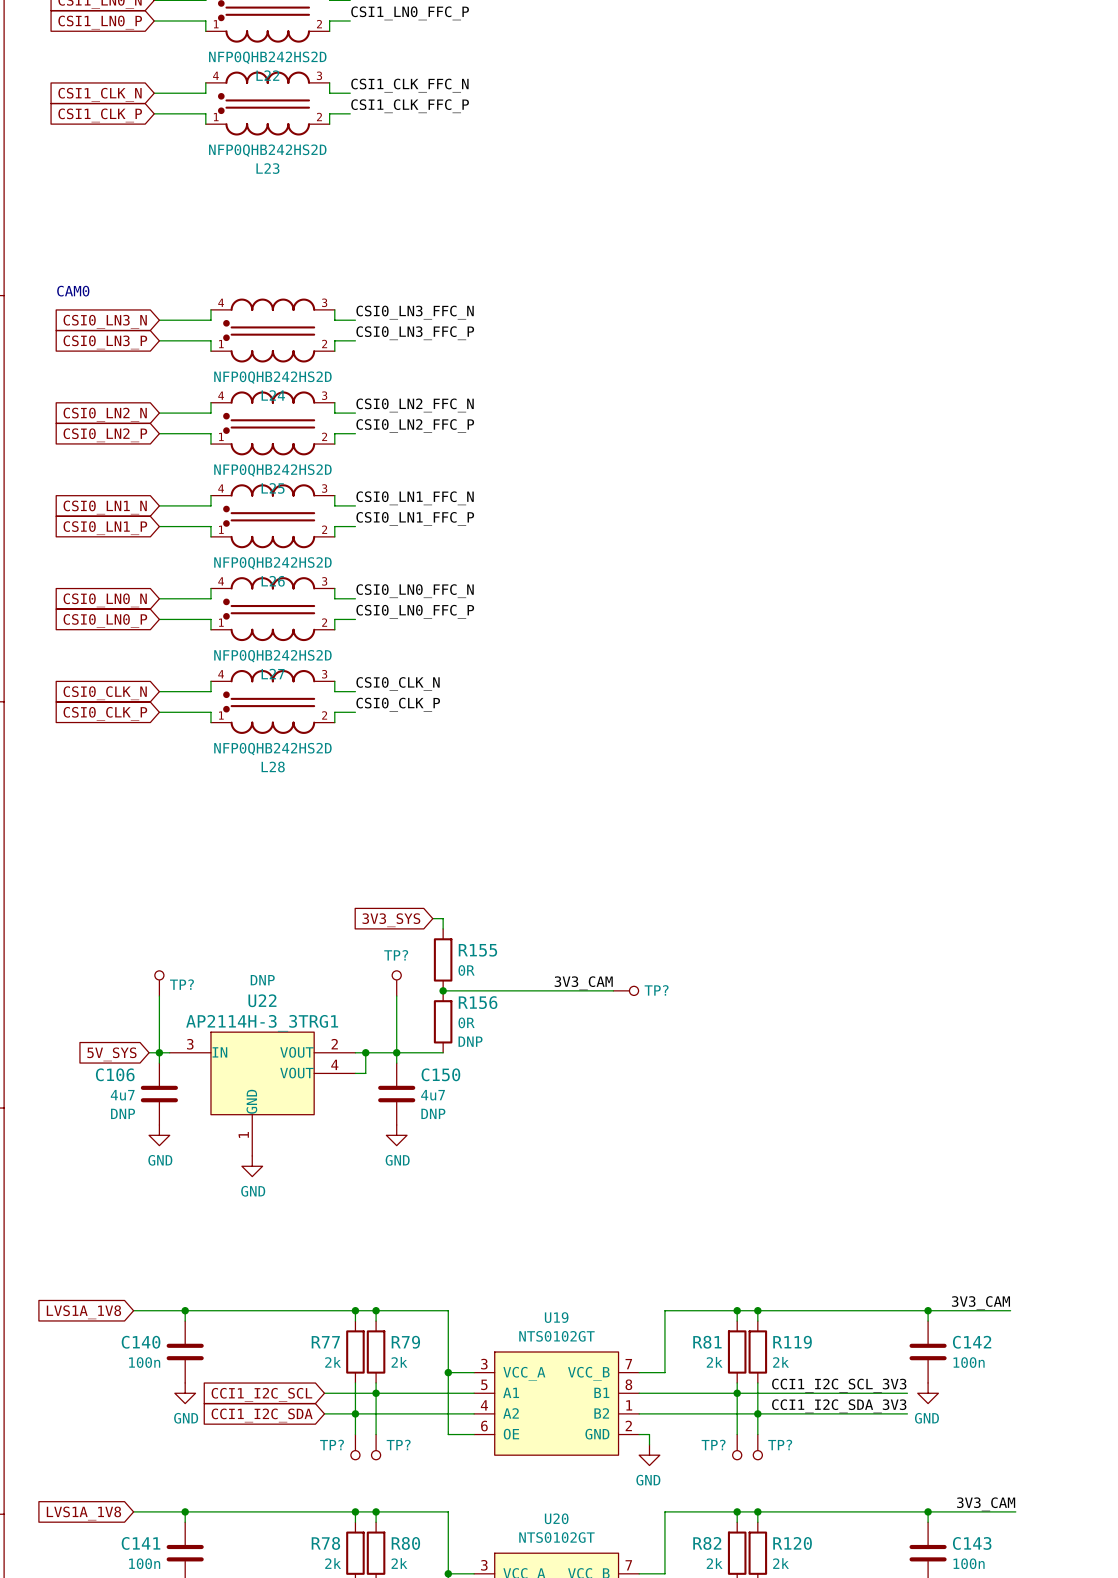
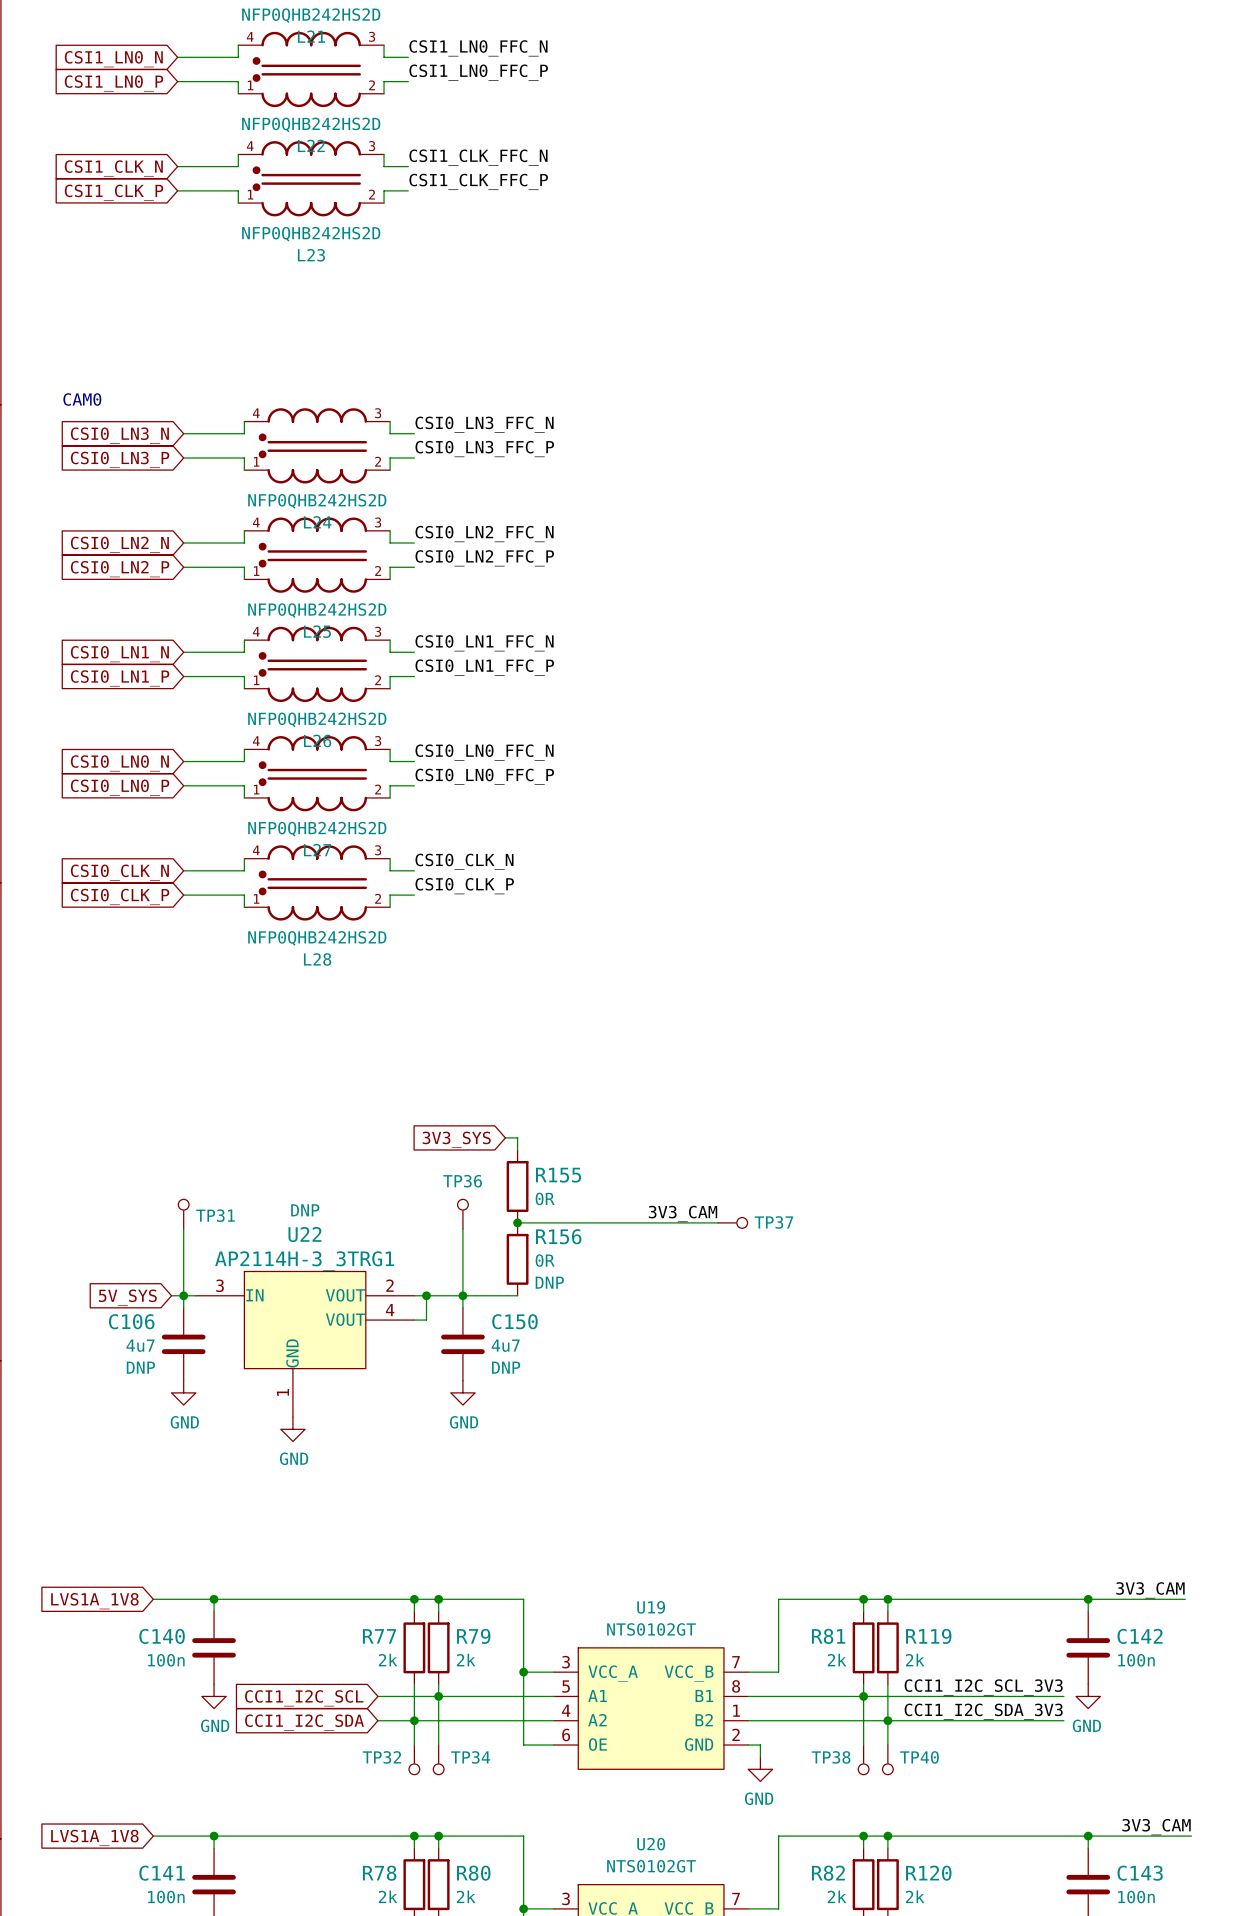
TP? name: TP? (396, 955) -> TP36 (462, 1181)
TP? name: TP? (181, 984) -> TP31 (215, 1215)
TP? name: TP? (656, 990) -> TP37 (773, 1222)
TP? name: TP? (332, 1445) -> TP32 (381, 1757)
TP? name: TP? (398, 1445) -> TP34 (470, 1757)
TP? name: TP? (713, 1445) -> TP38 (831, 1757)
TP? name: TP? (780, 1445) -> TP40 (919, 1757)

